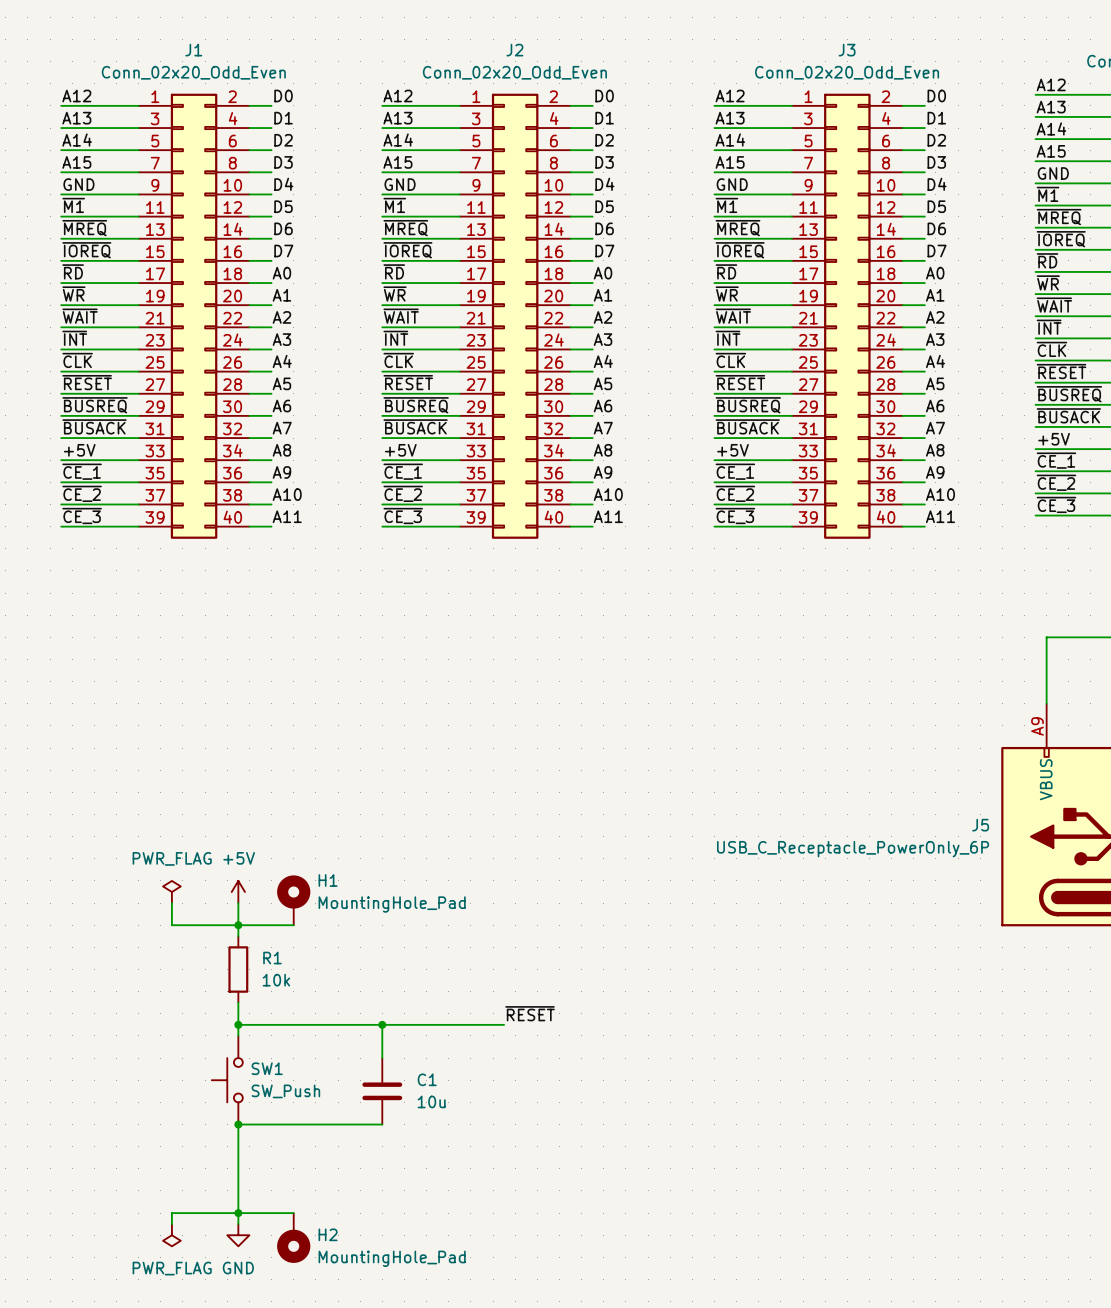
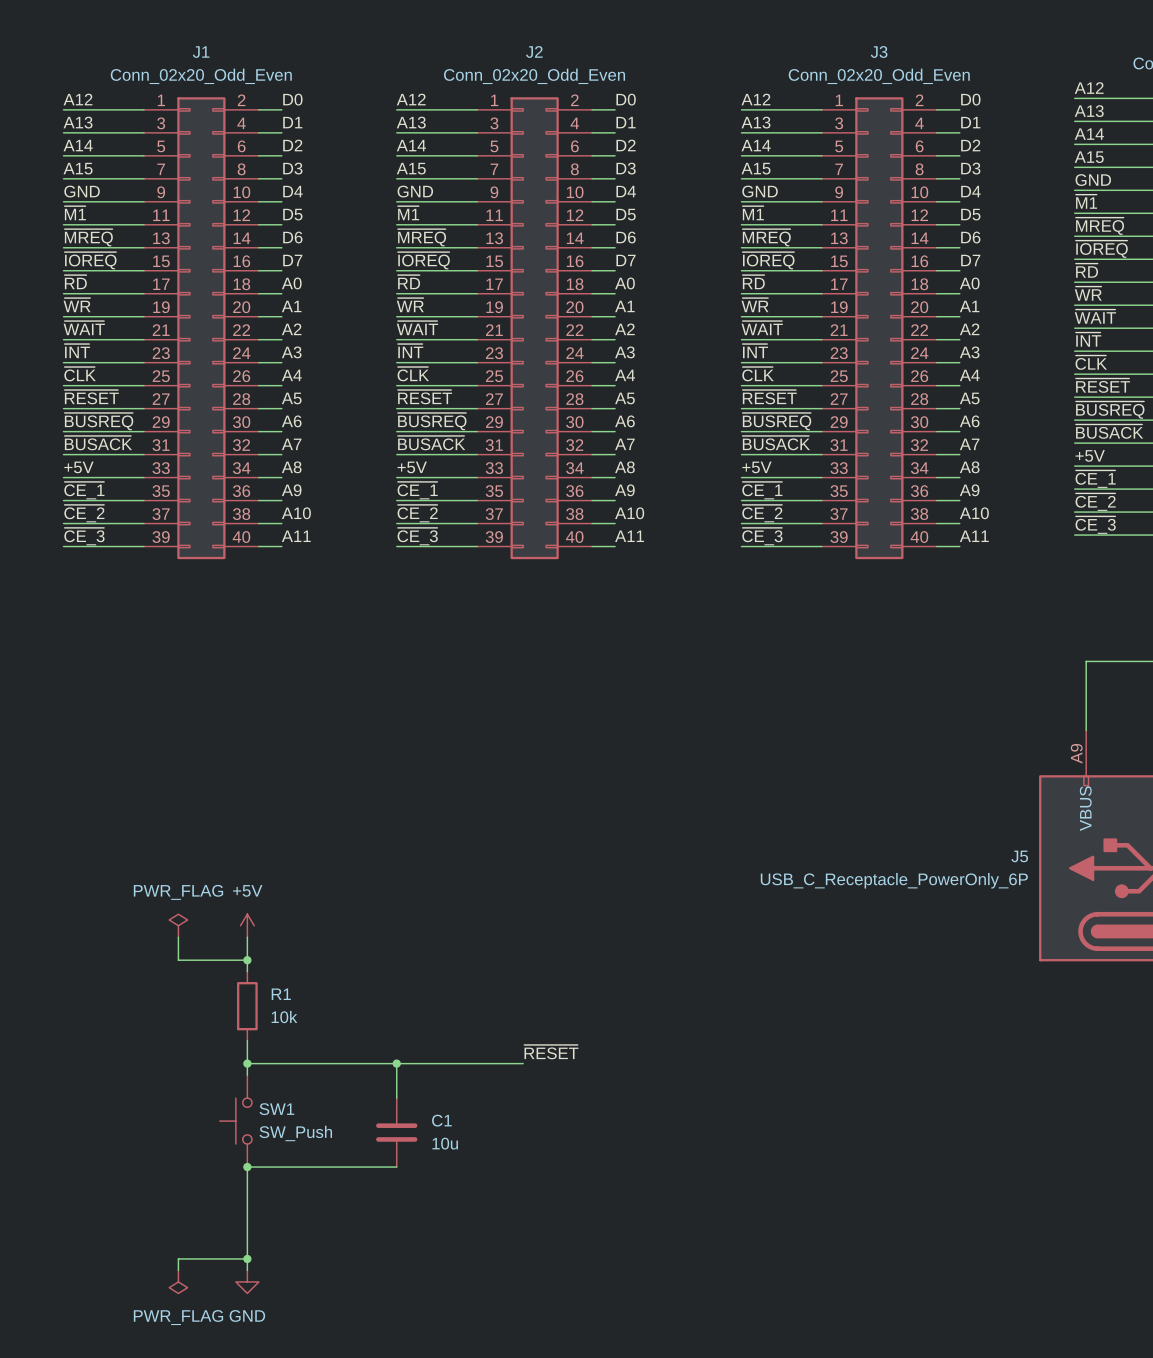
H1: MountingHole_Pad (293, 900) -> none
wire: (238, 925) (293, 925) -> none
wire: (238, 1213) (293, 1213) -> none
H2: MountingHole_Pad (293, 1238) -> none

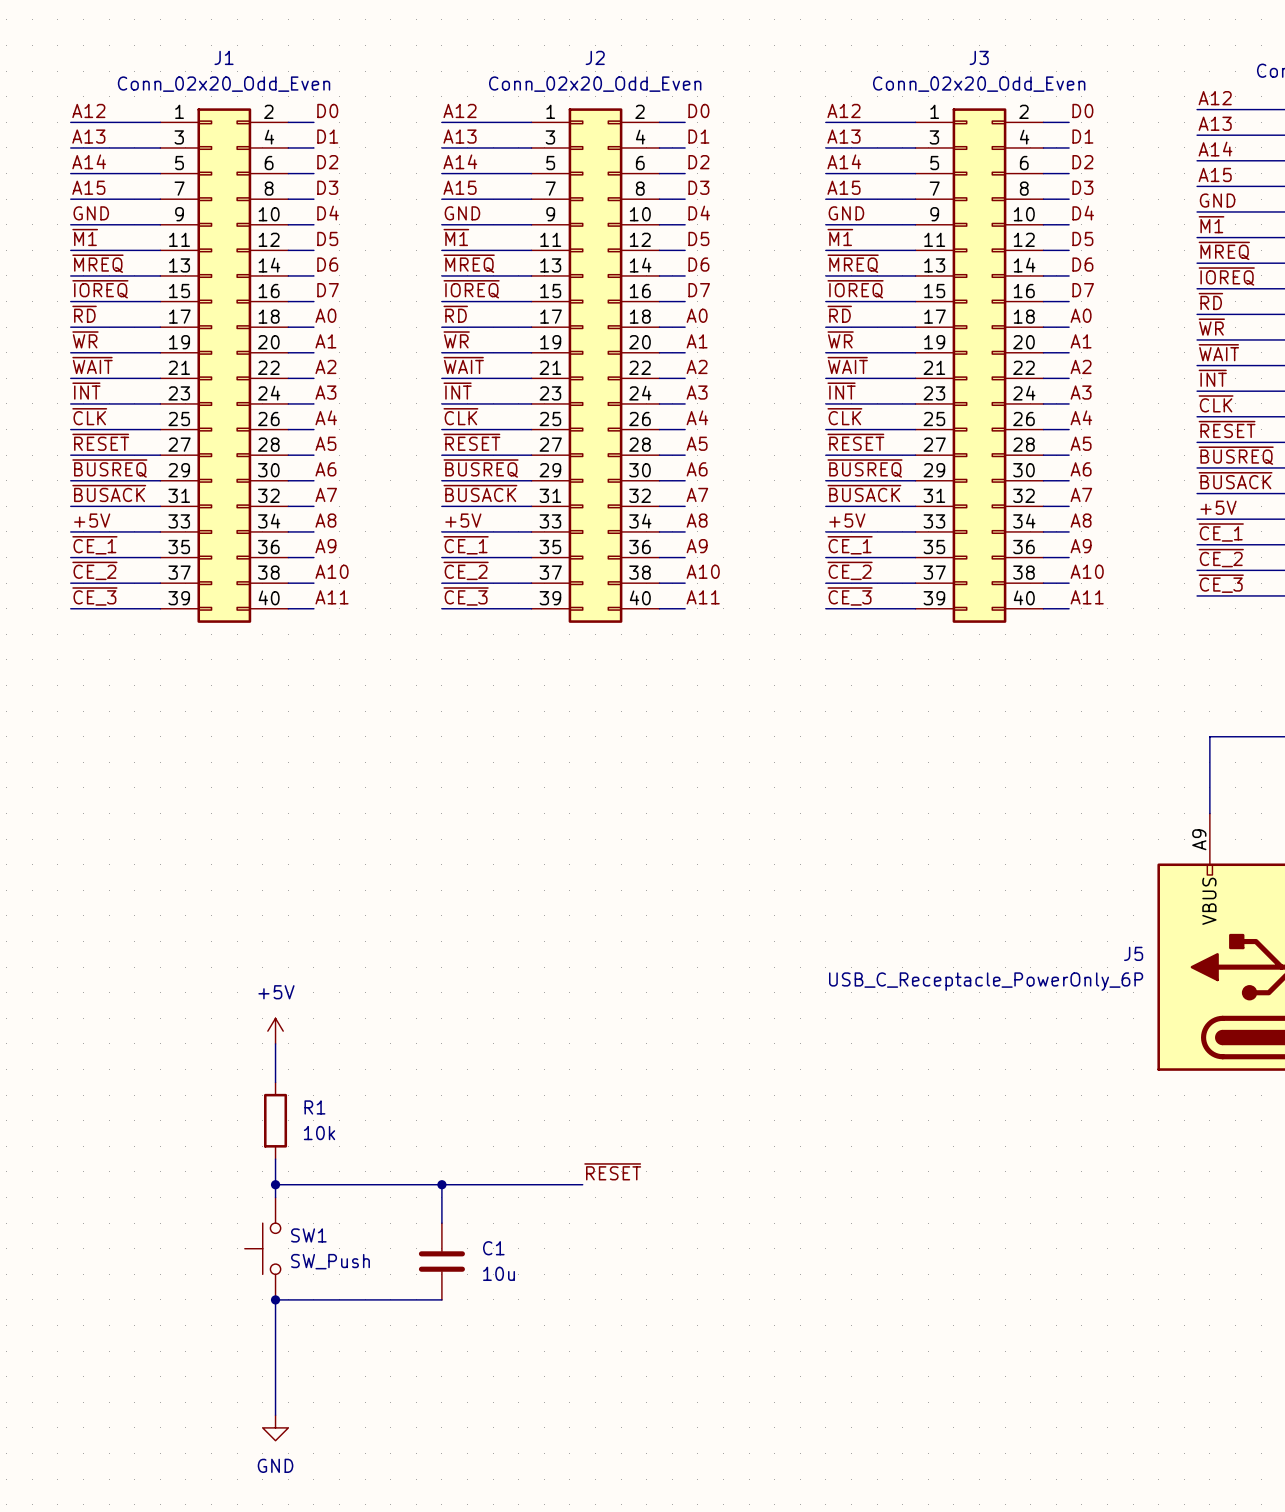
power symbol: PWR_FLAG (178, 925) -> none
wire: (178, 937) (178, 960) (247, 960) -> none
junction: (247, 960) -> none
wire: (247, 1258) (178, 1258) (178, 1270) -> none
junction: (247, 1258) -> none
power symbol: PWR_FLAG (178, 1281) -> none

